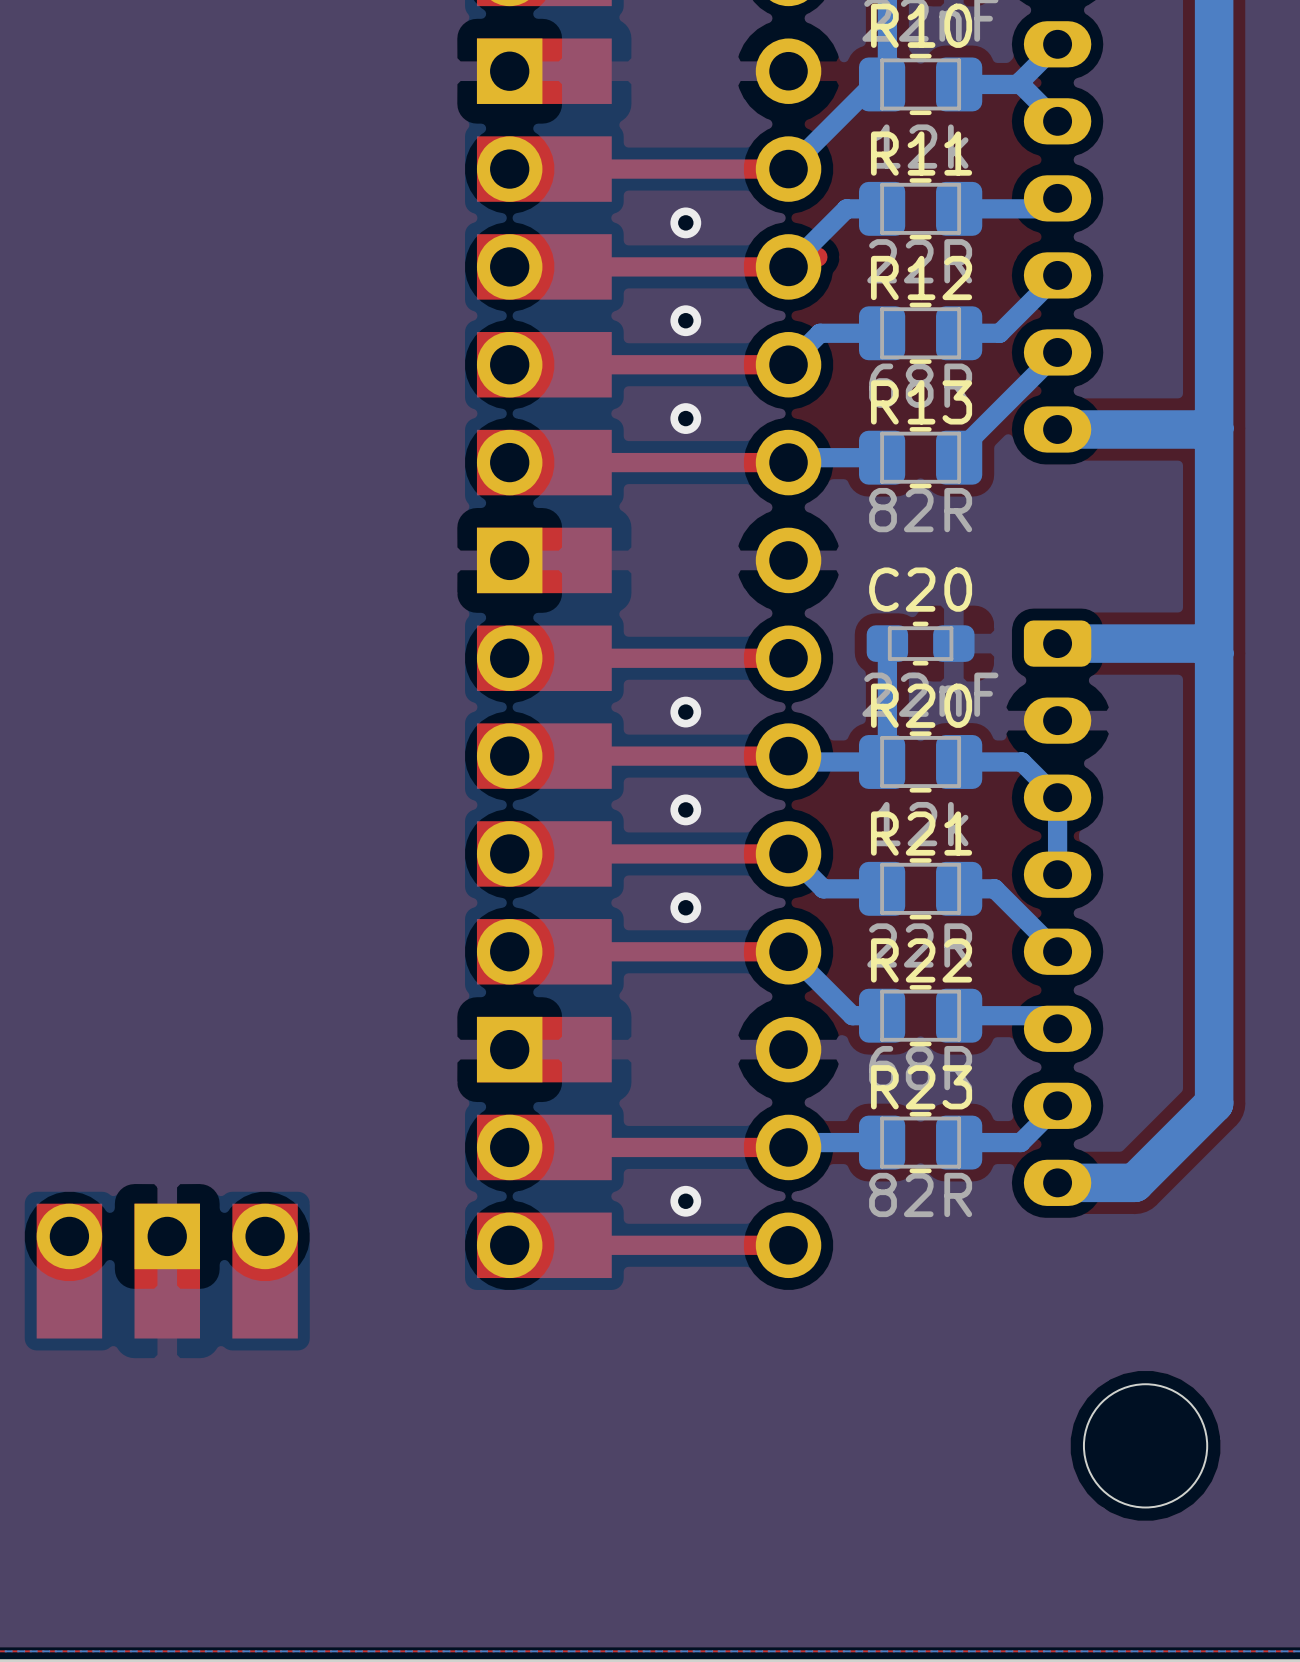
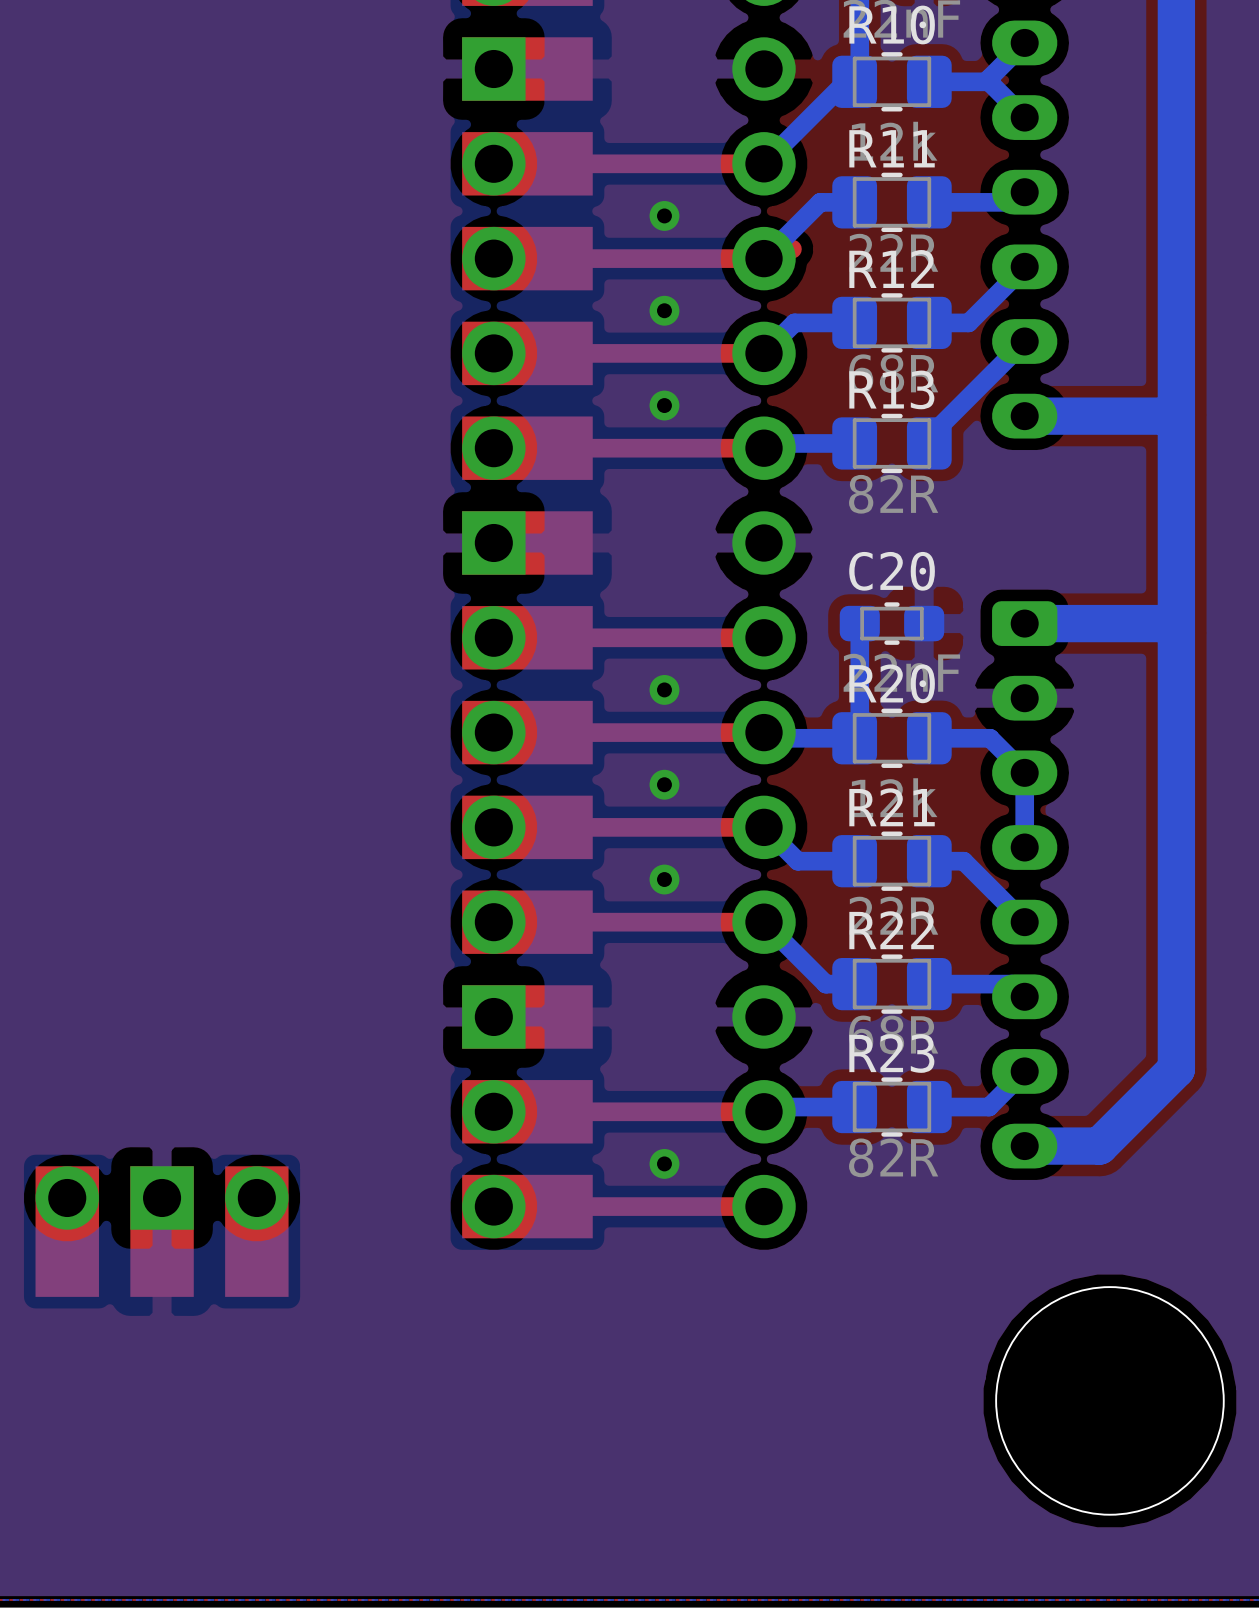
round board edge size: [1082, 1383, 1209, 1509] -> [995, 1286, 1225, 1516]

